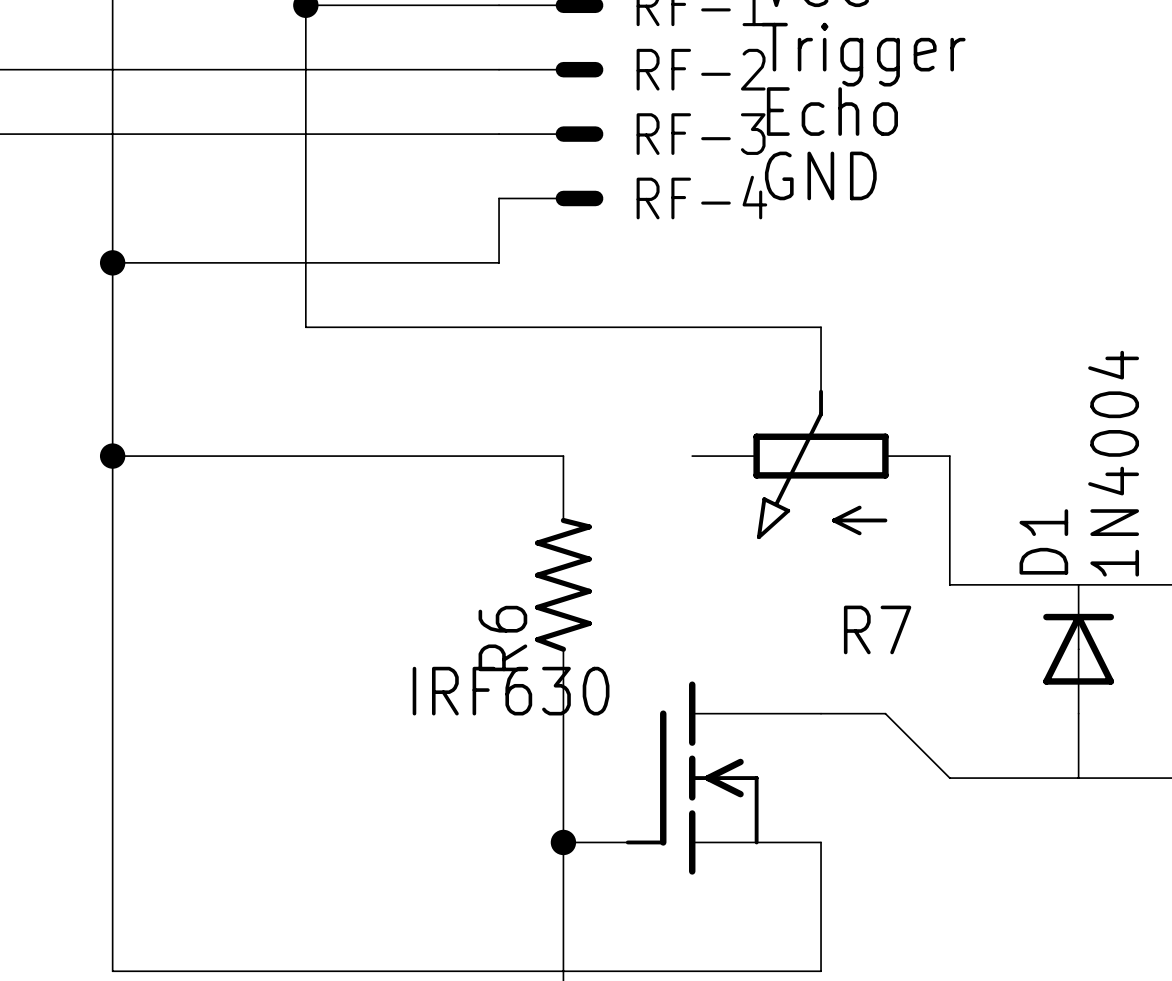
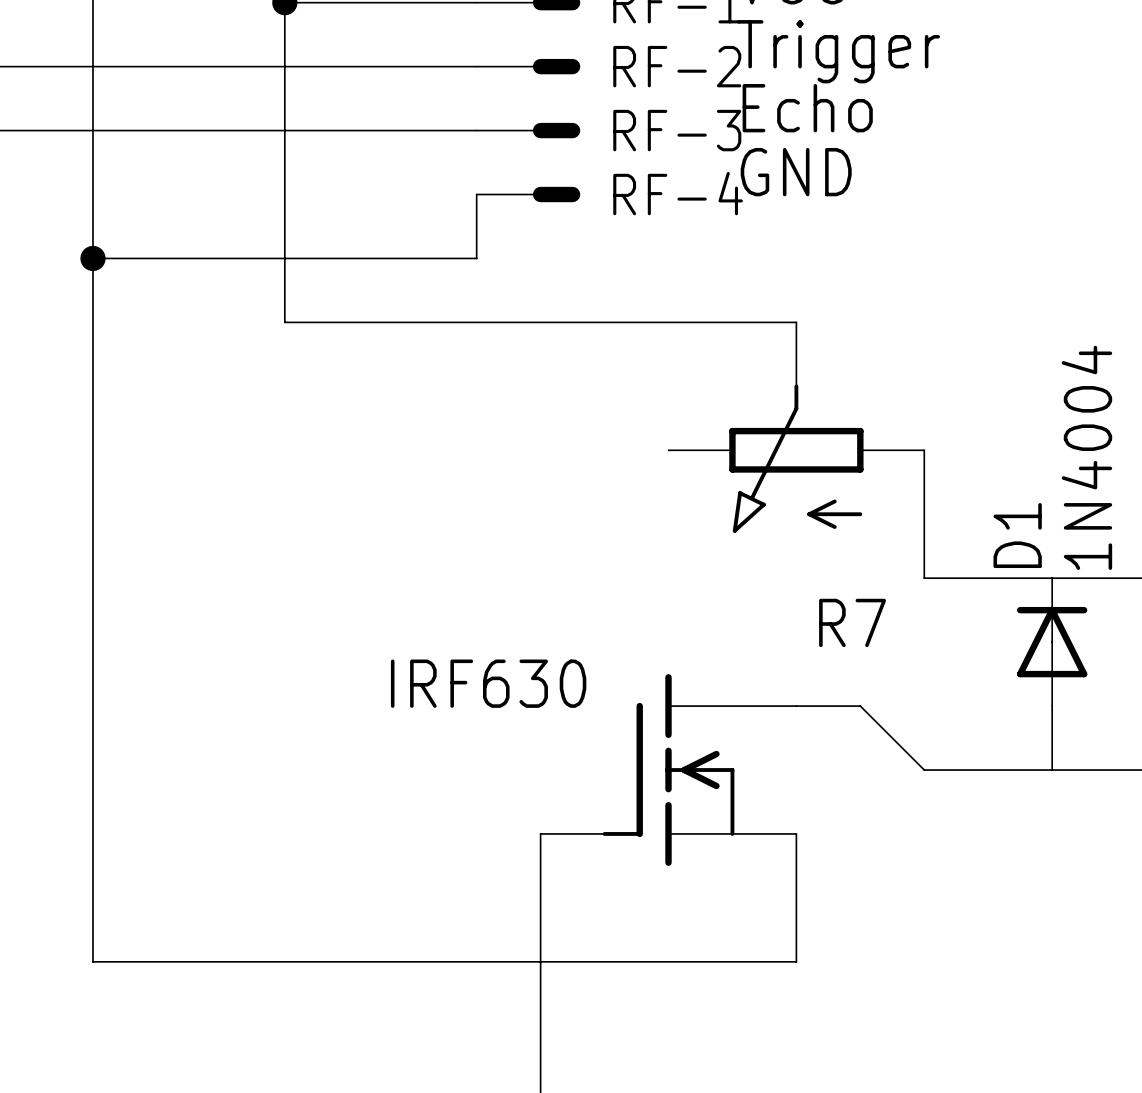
wire: (112, 456) (563, 456) -> none
junction: (112, 456) -> none
R6: (563, 584) -> none
wire: (563, 713) (563, 842) -> none
junction: (563, 842) -> none

